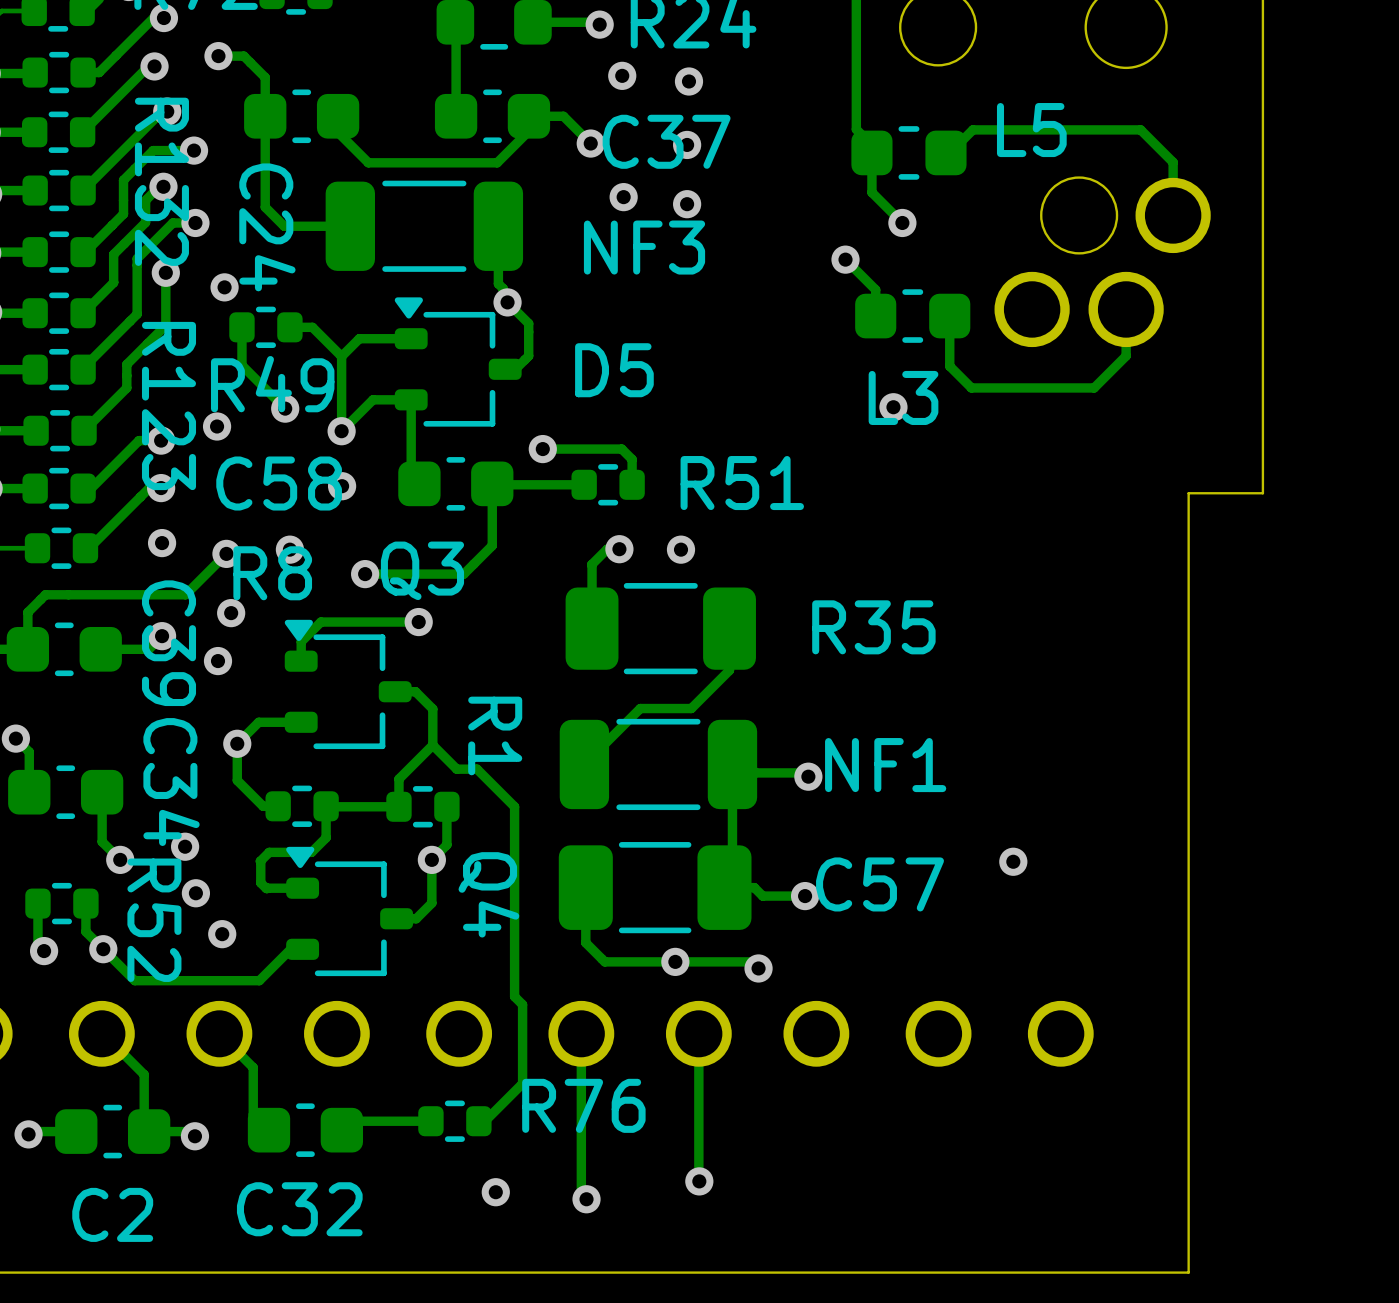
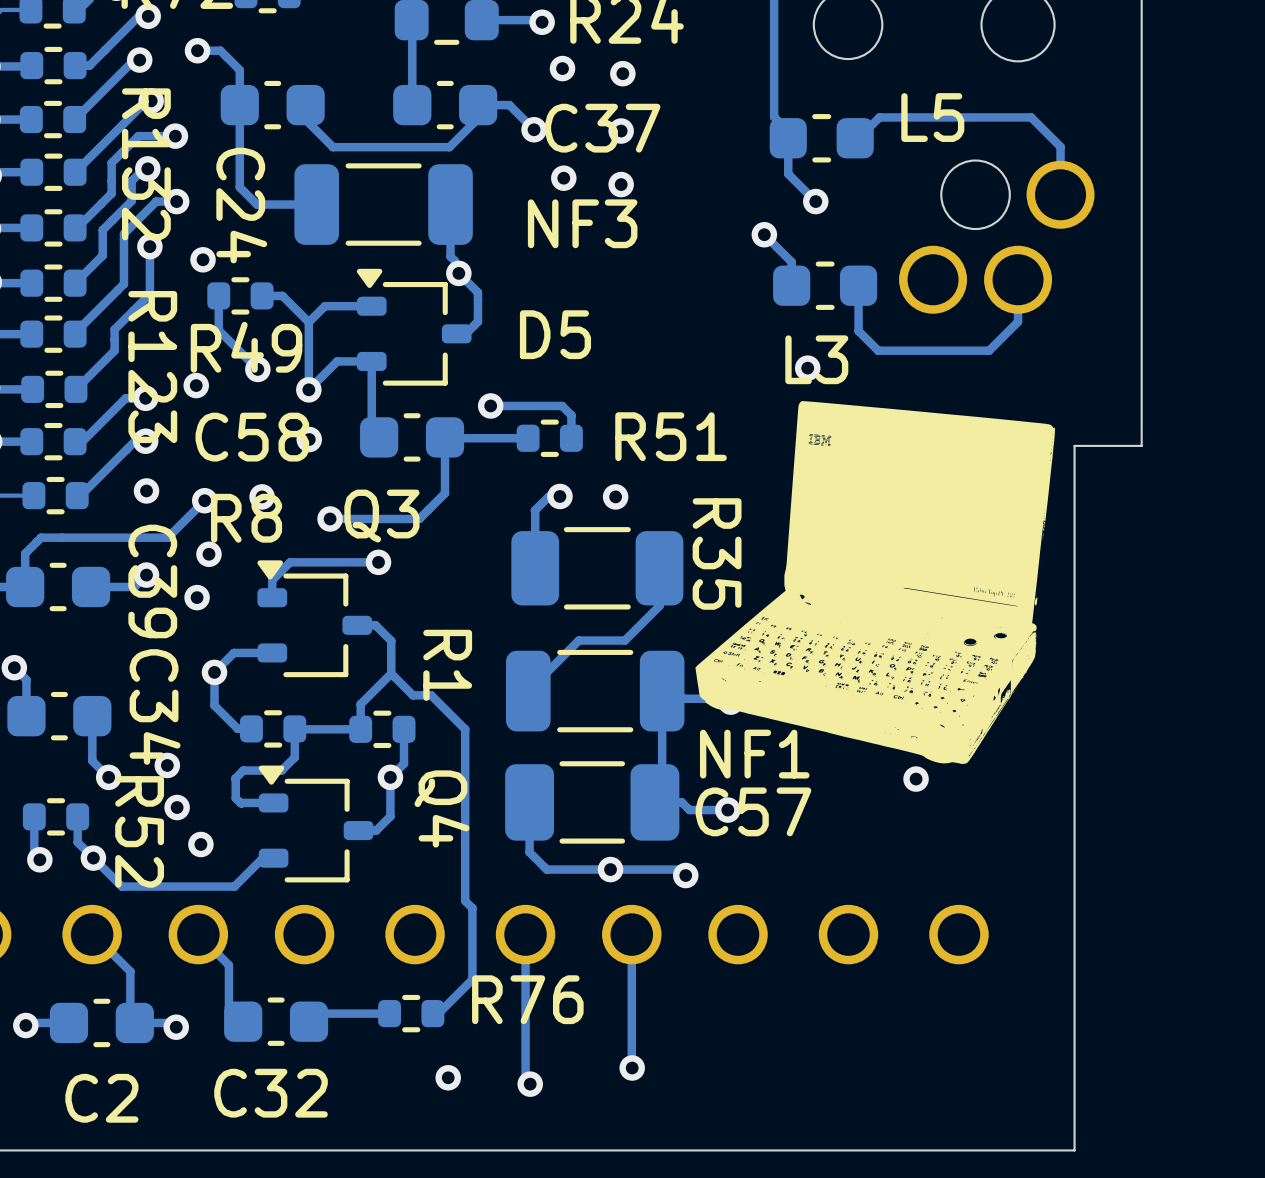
R35 name rotation: 0° (873, 627) -> 90° clockwise (717, 554)
part: none -> (875, 582)
NF1 name position: NF1 (885, 765) -> NF1 (754, 754)
C57 name position: C57 (880, 884) -> C57 (753, 811)

